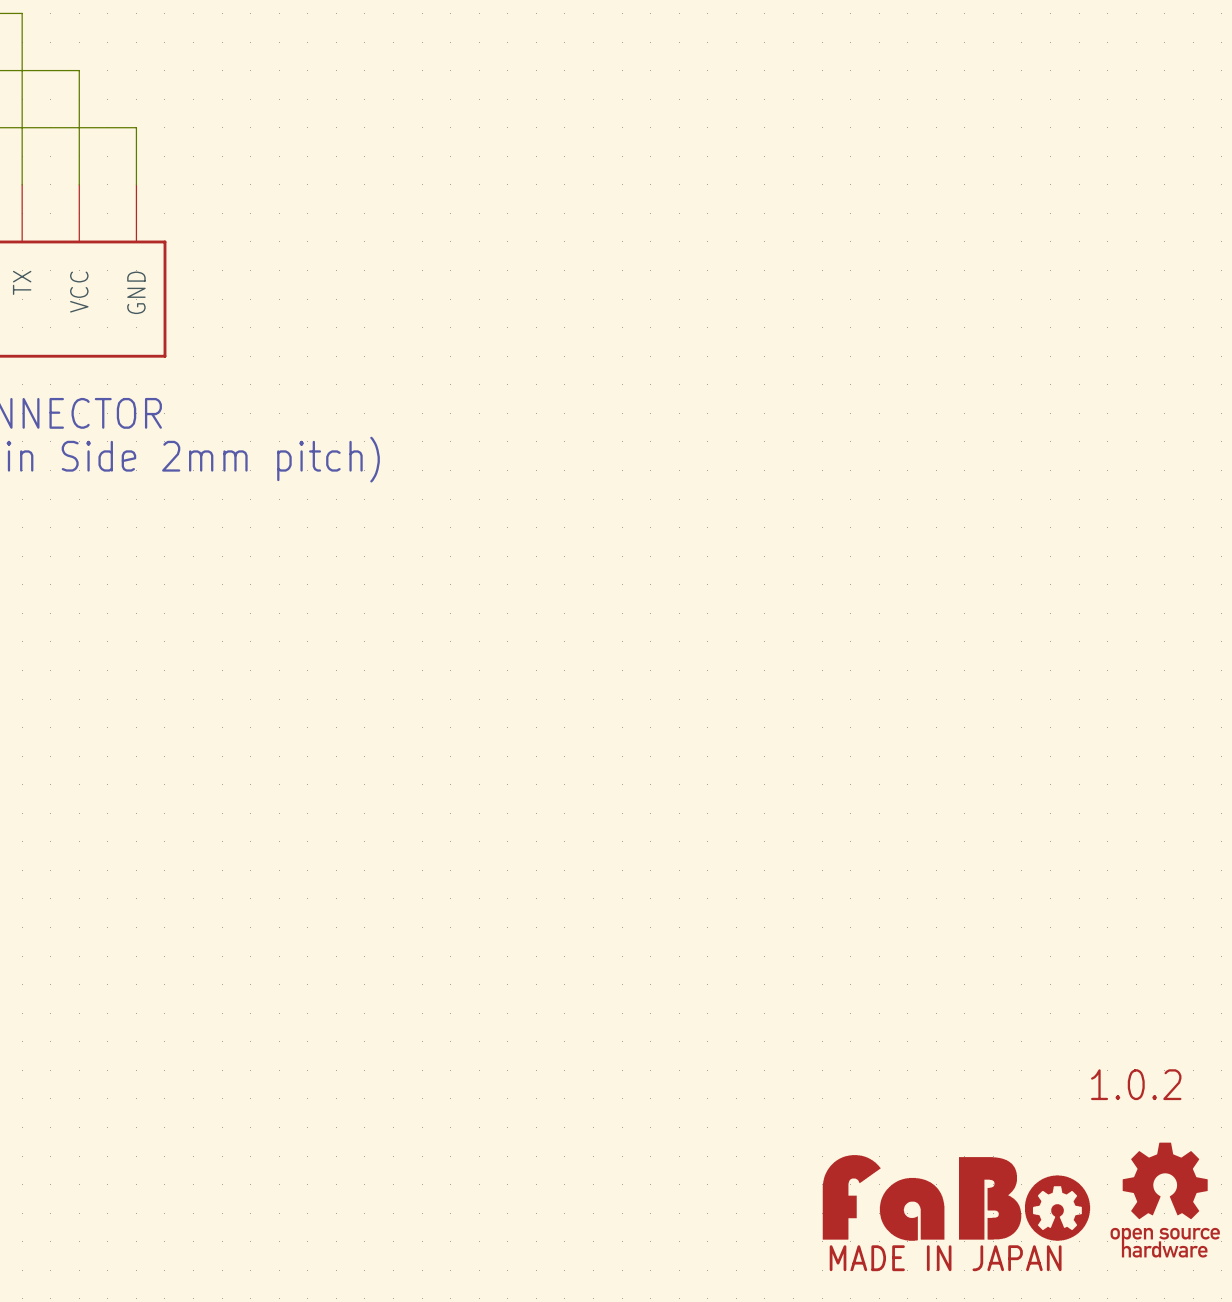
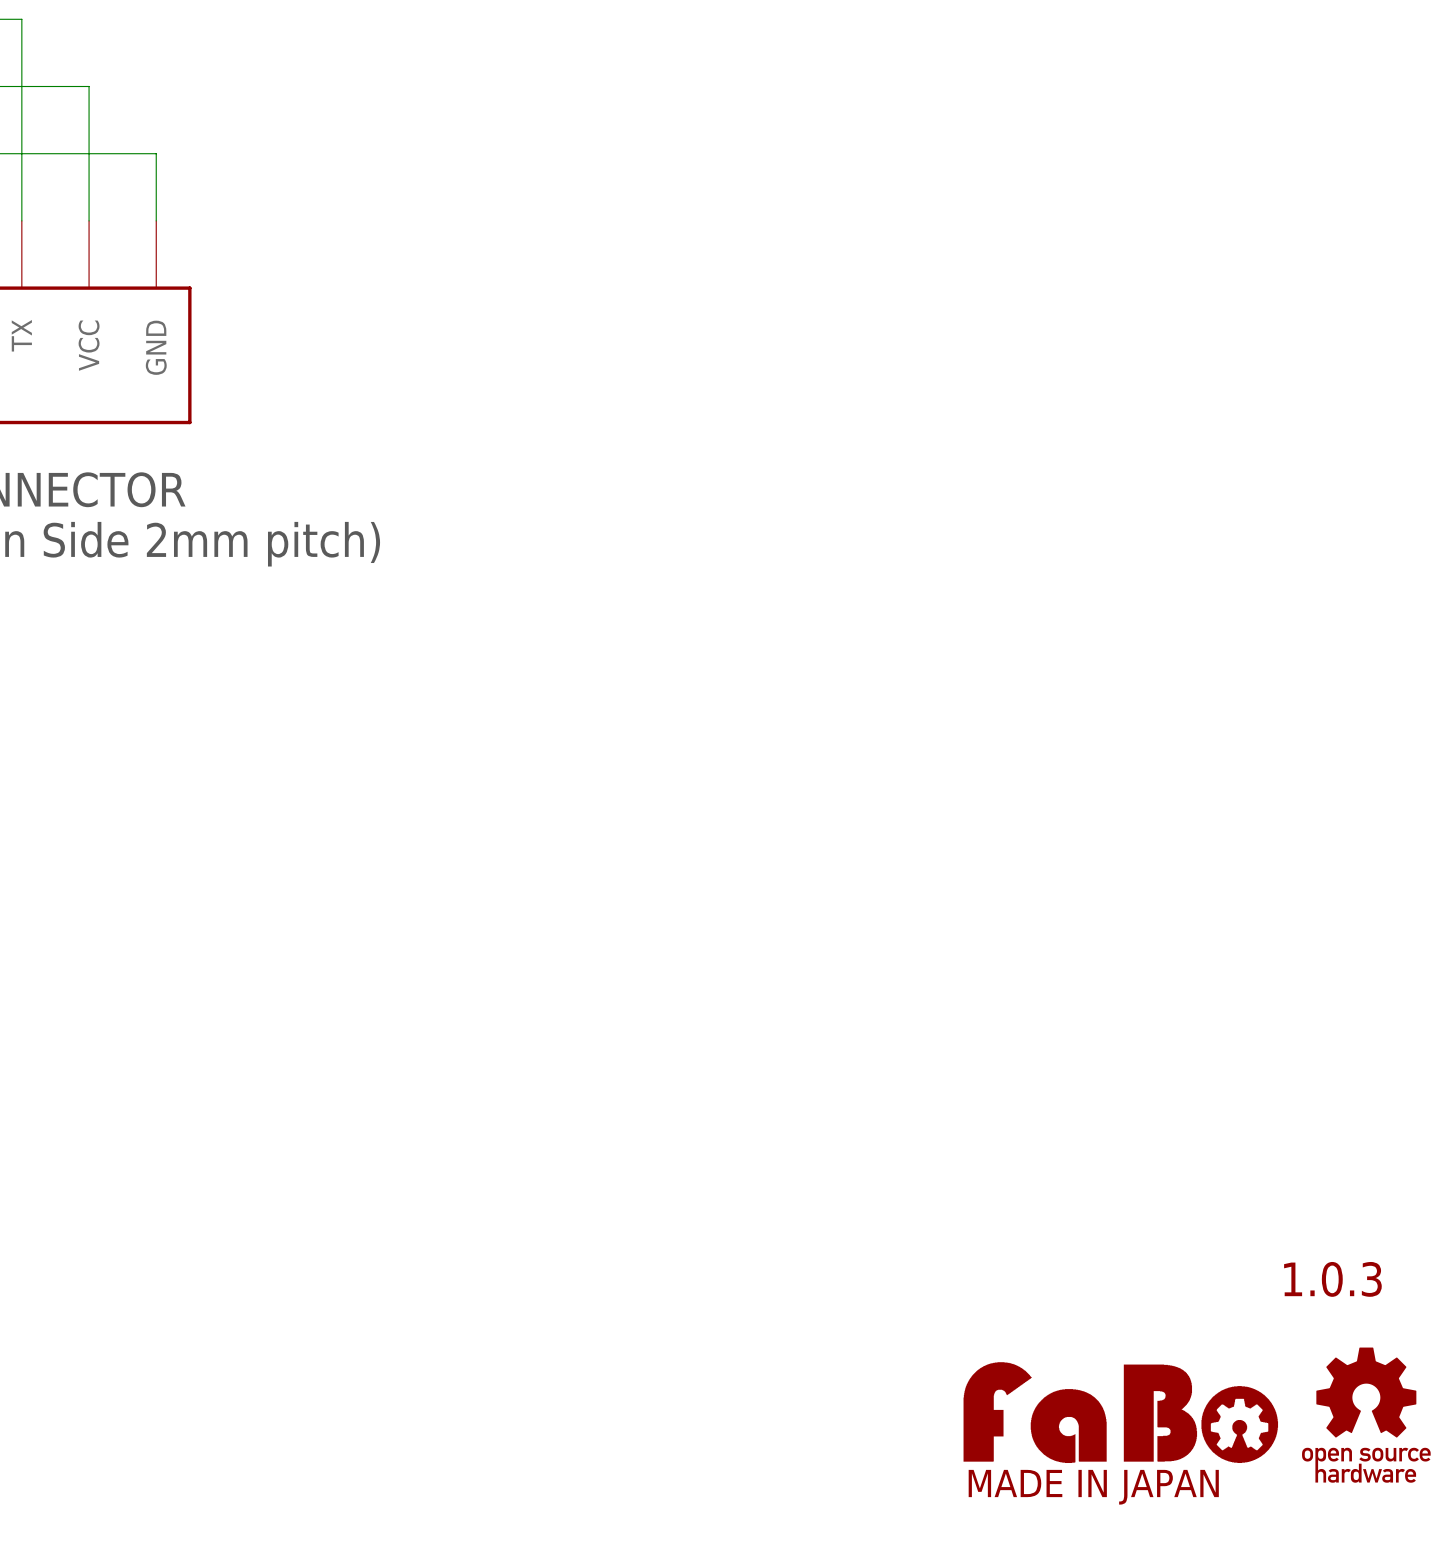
text: 1.0.2 (1136, 1084) -> 1.0.3 (1332, 1279)

